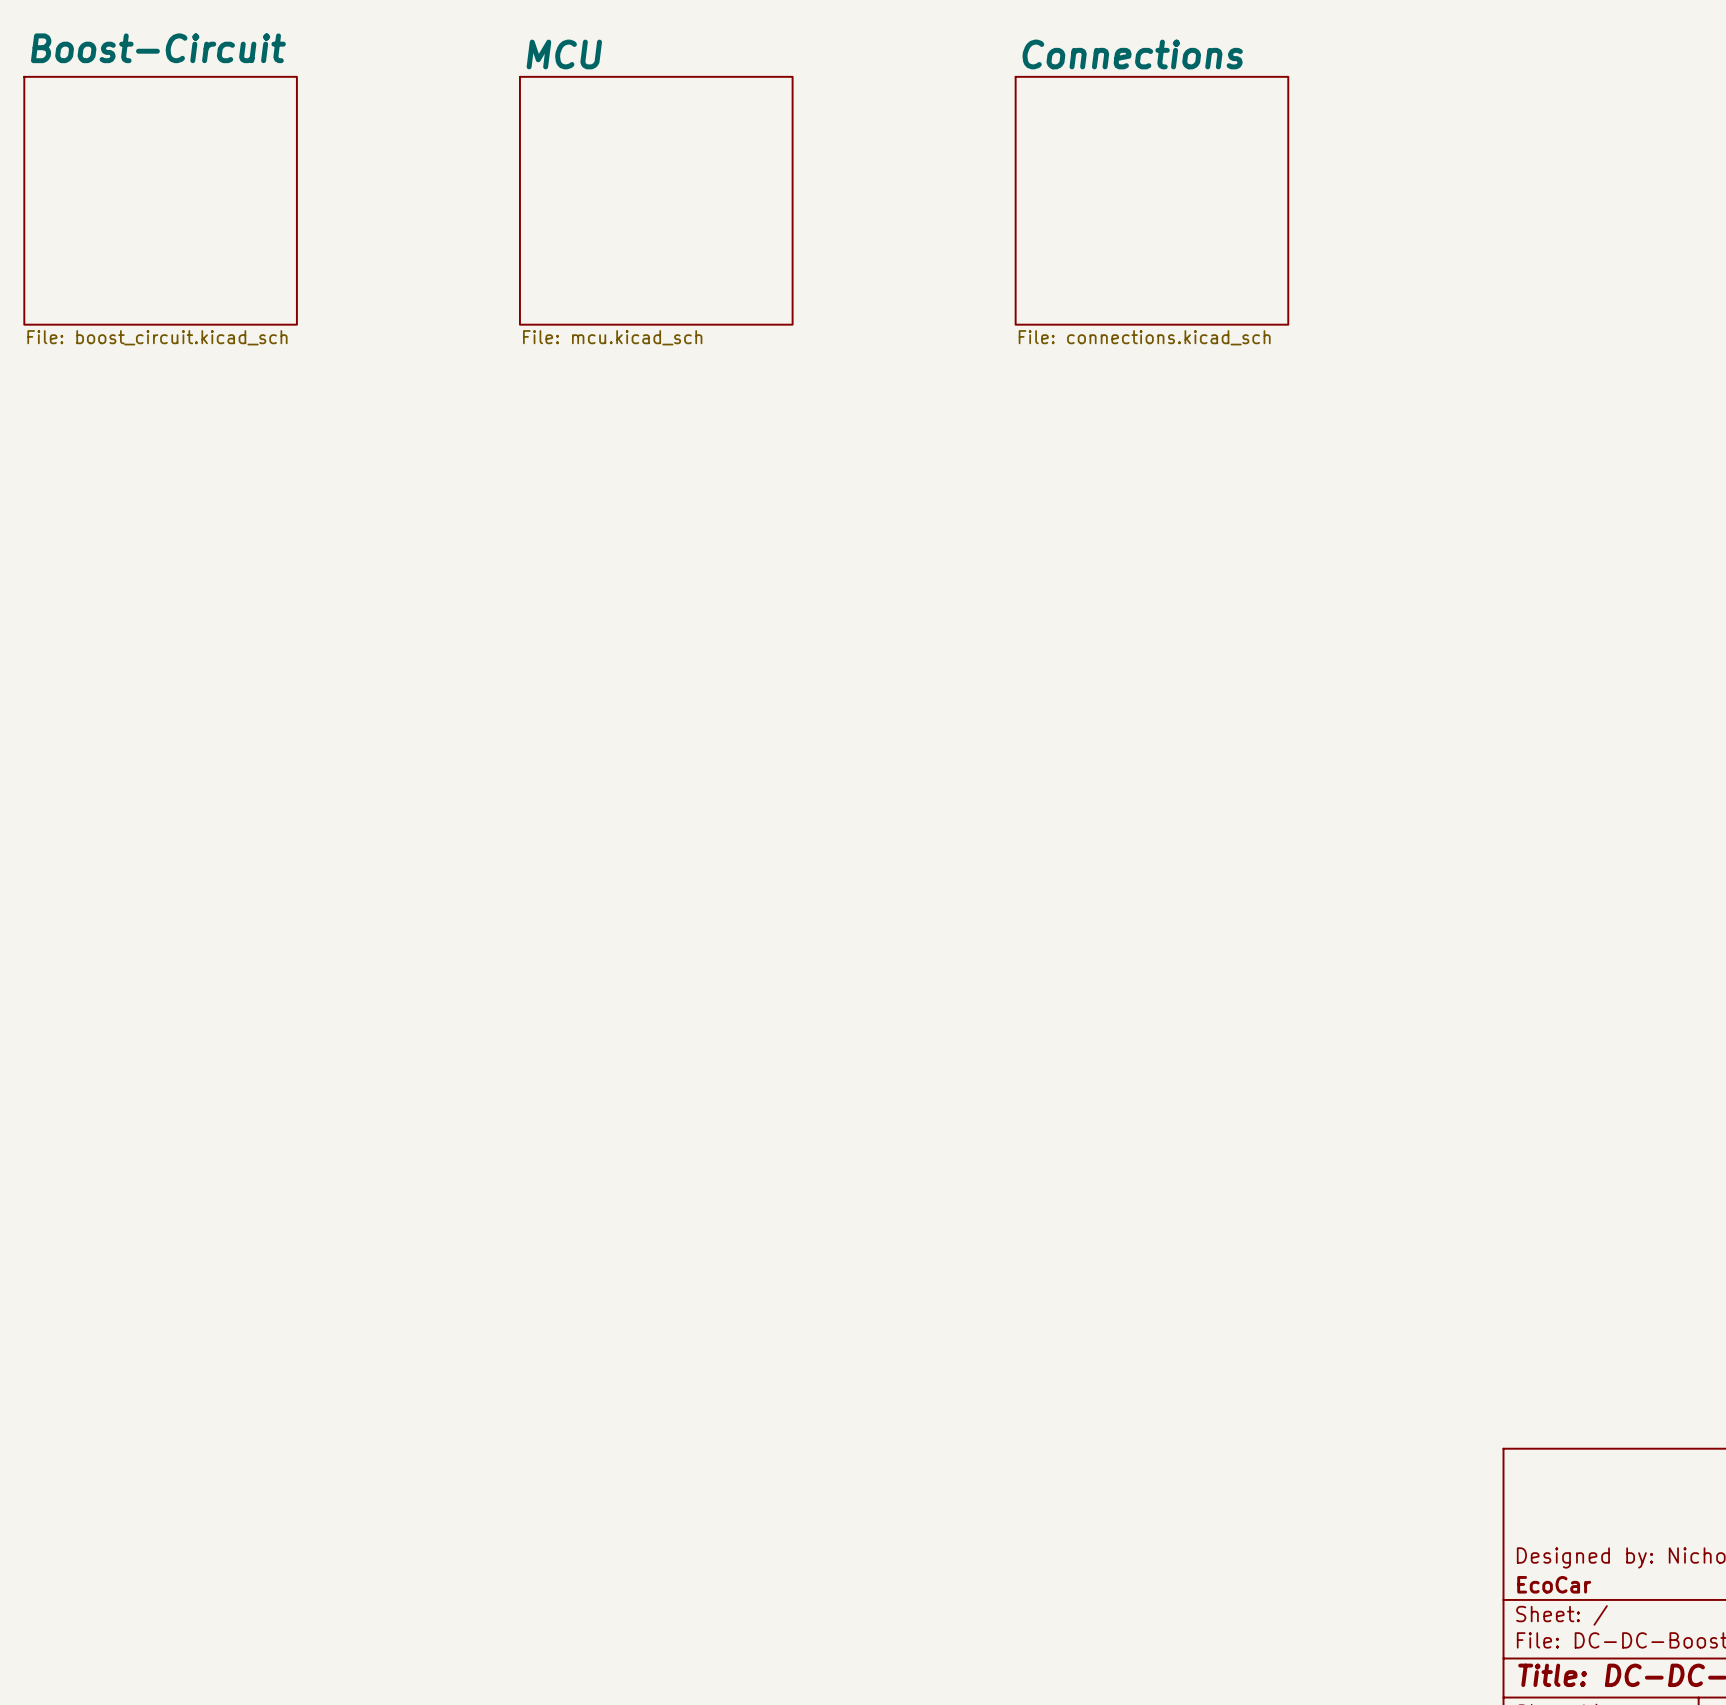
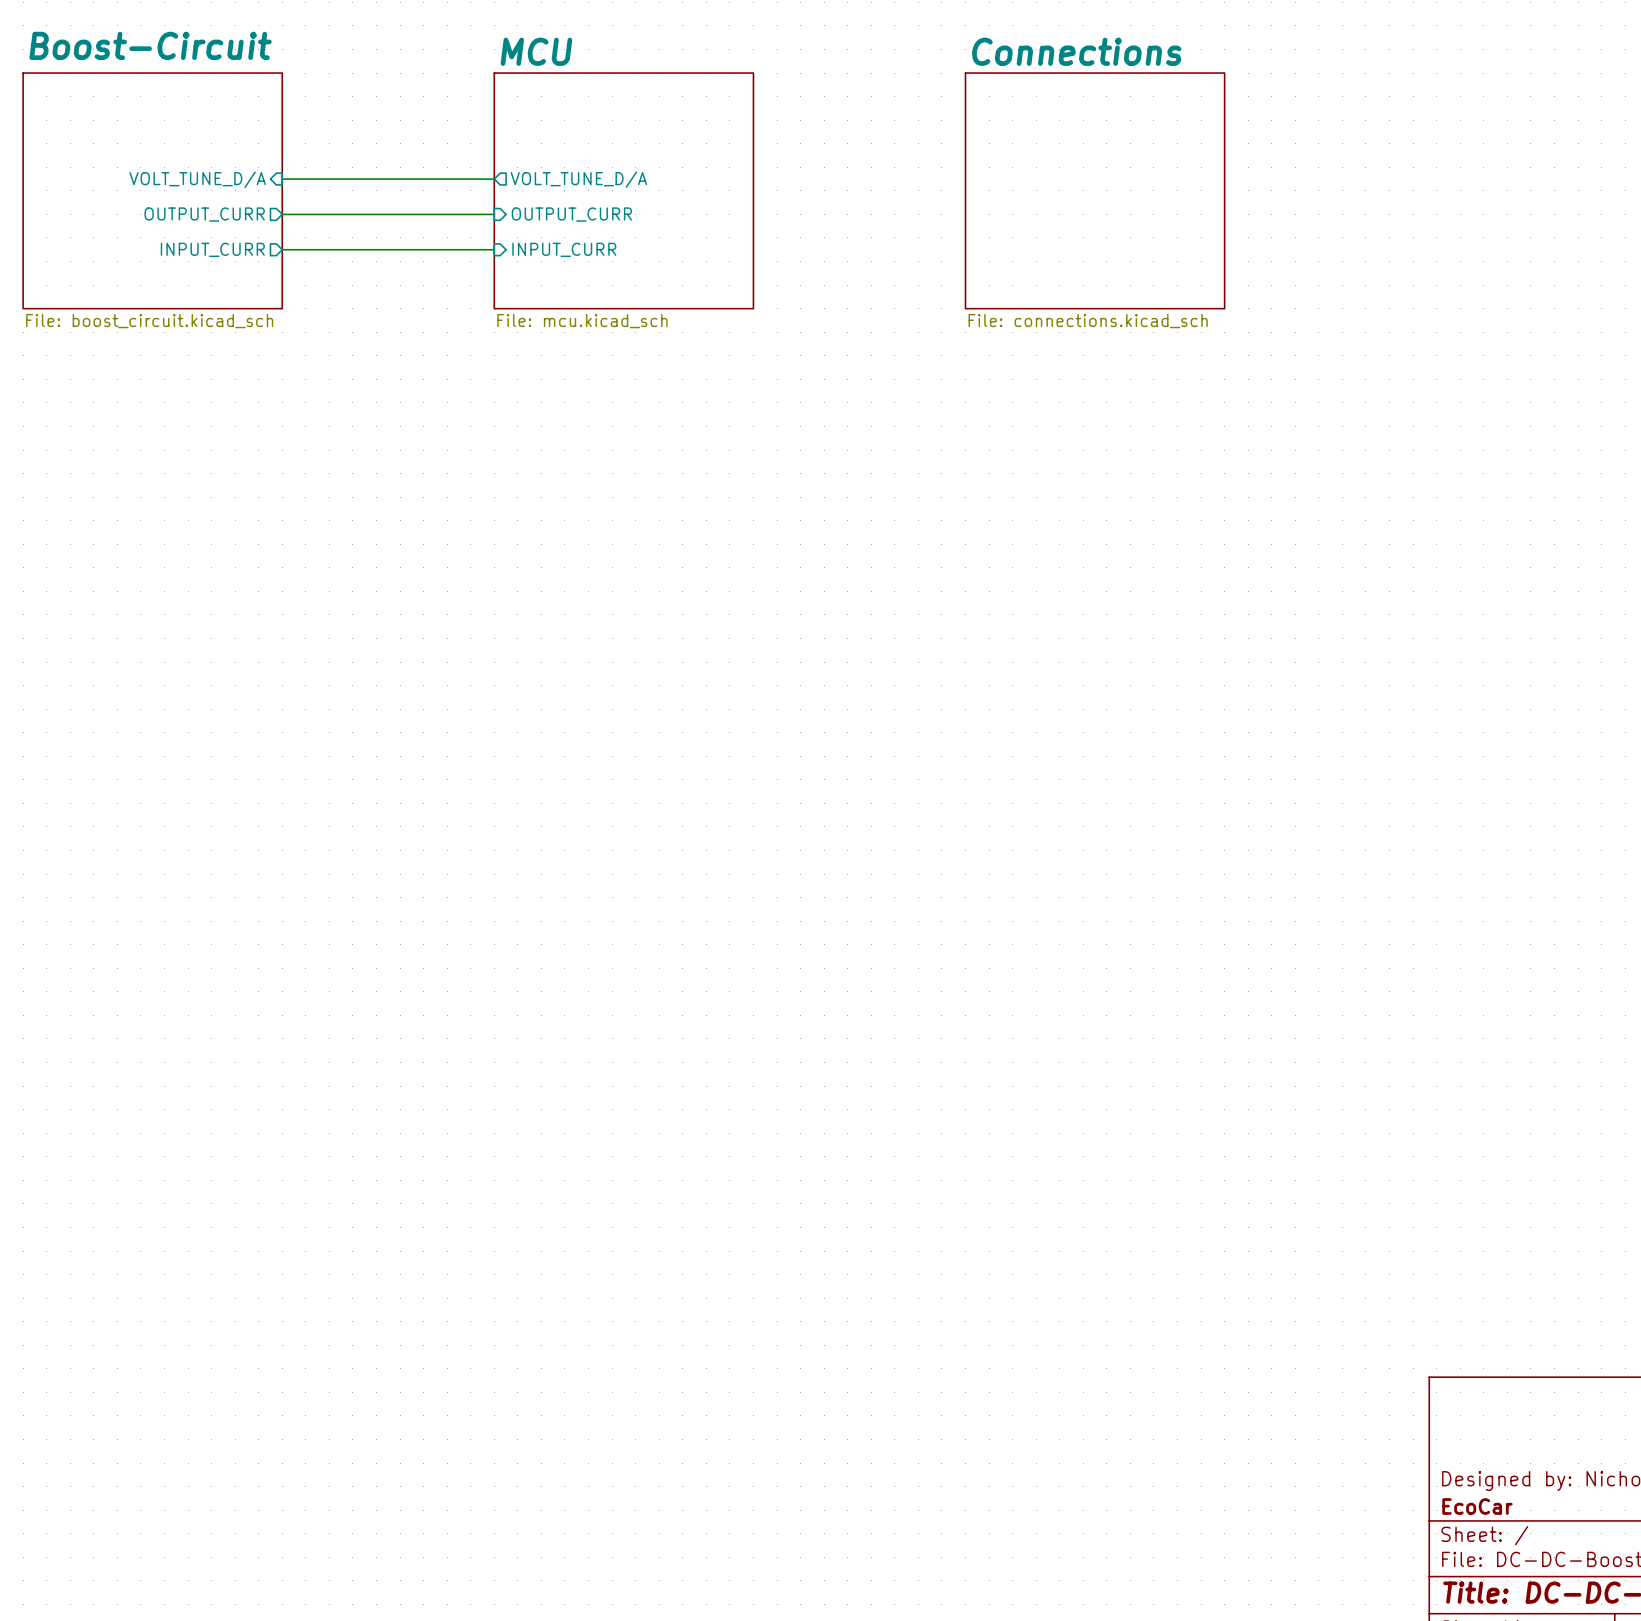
wire: none -> (282, 179) (494, 179)
sheet pin: none -> VOLT_TUNE_D/A (197, 179)
sheet pin: none -> VOLT_TUNE_D/A (578, 179)
sheet pin: none -> OUTPUT_CURR (204, 214)
wire: none -> (282, 214) (494, 214)
sheet pin: none -> OUTPUT_CURR (571, 214)
sheet pin: none -> INPUT_CURR (212, 249)
wire: none -> (282, 249) (494, 249)
sheet pin: none -> INPUT_CURR (564, 249)

